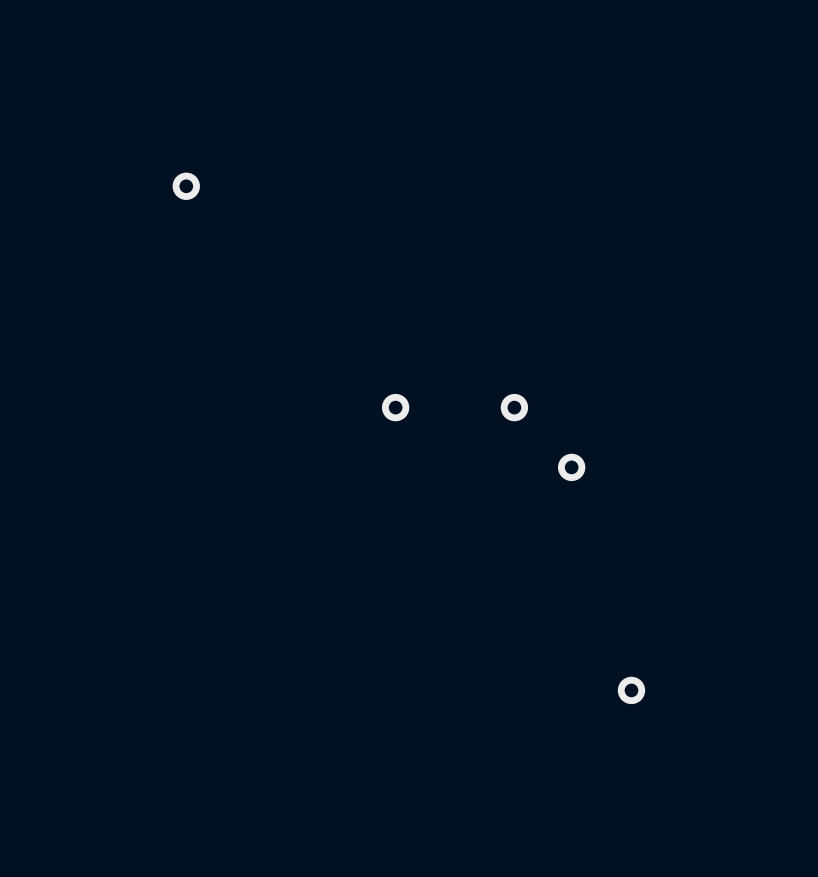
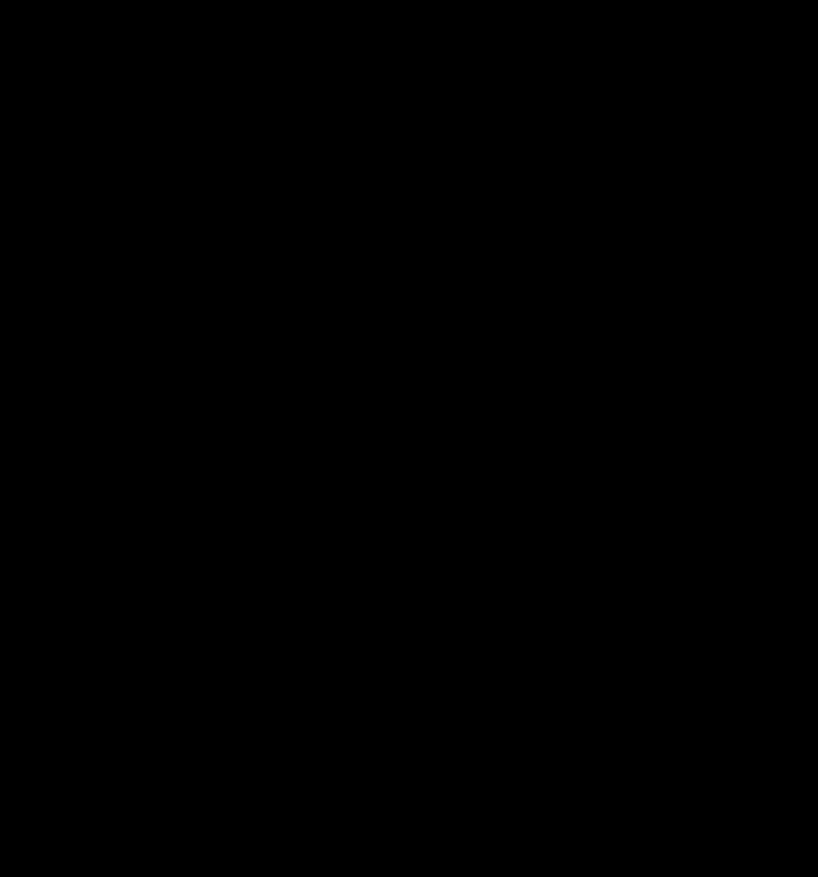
via: (186, 186) -> none
via: (395, 407) -> none
via: (514, 407) -> none
via: (571, 467) -> none
via: (631, 690) -> none

